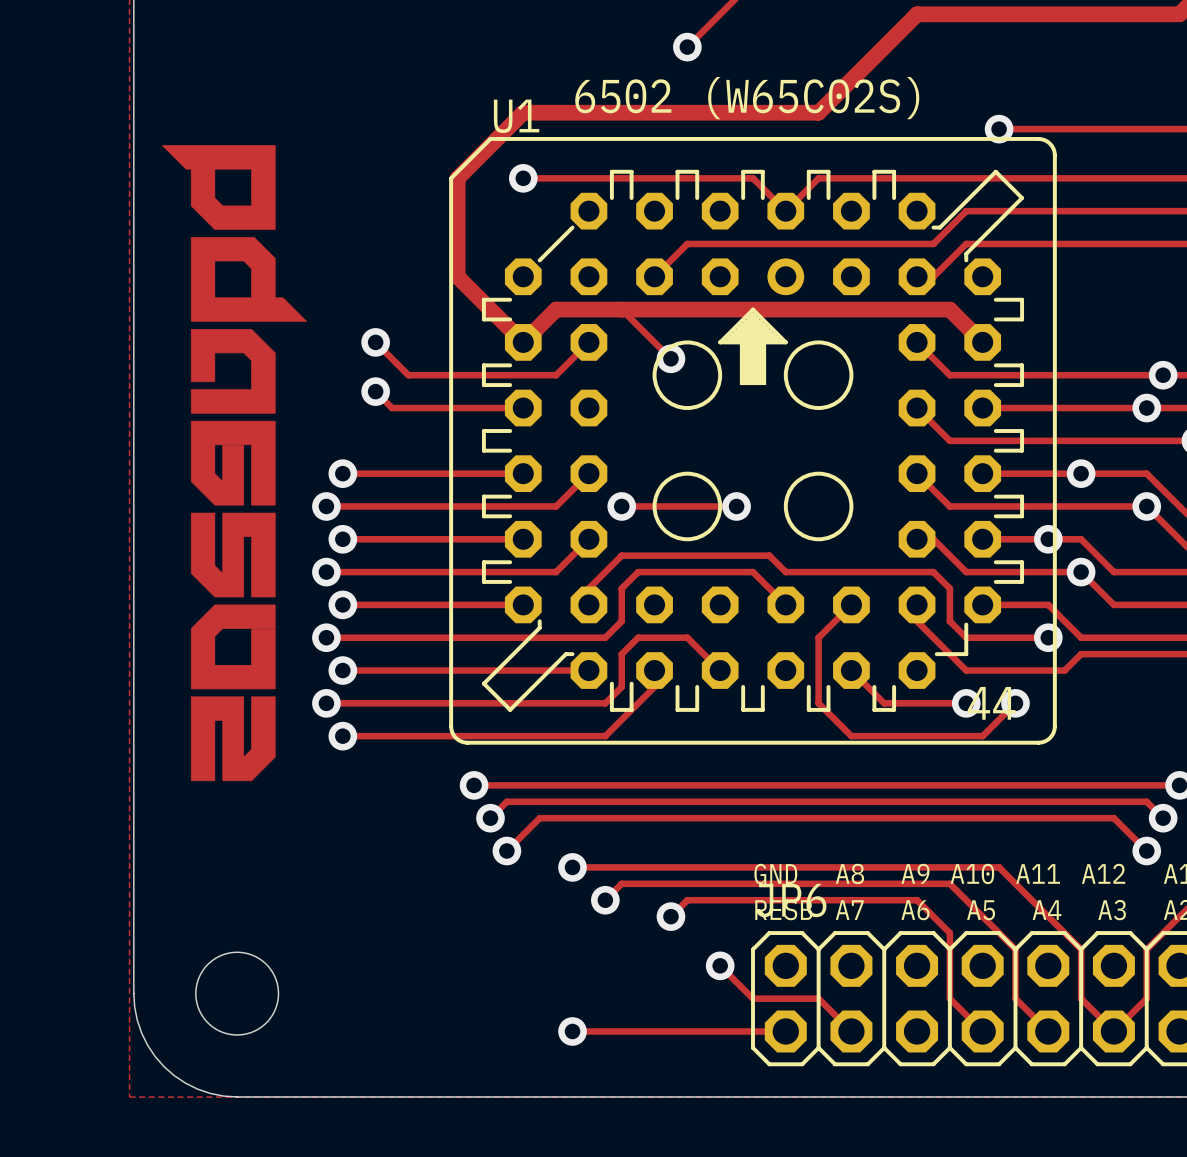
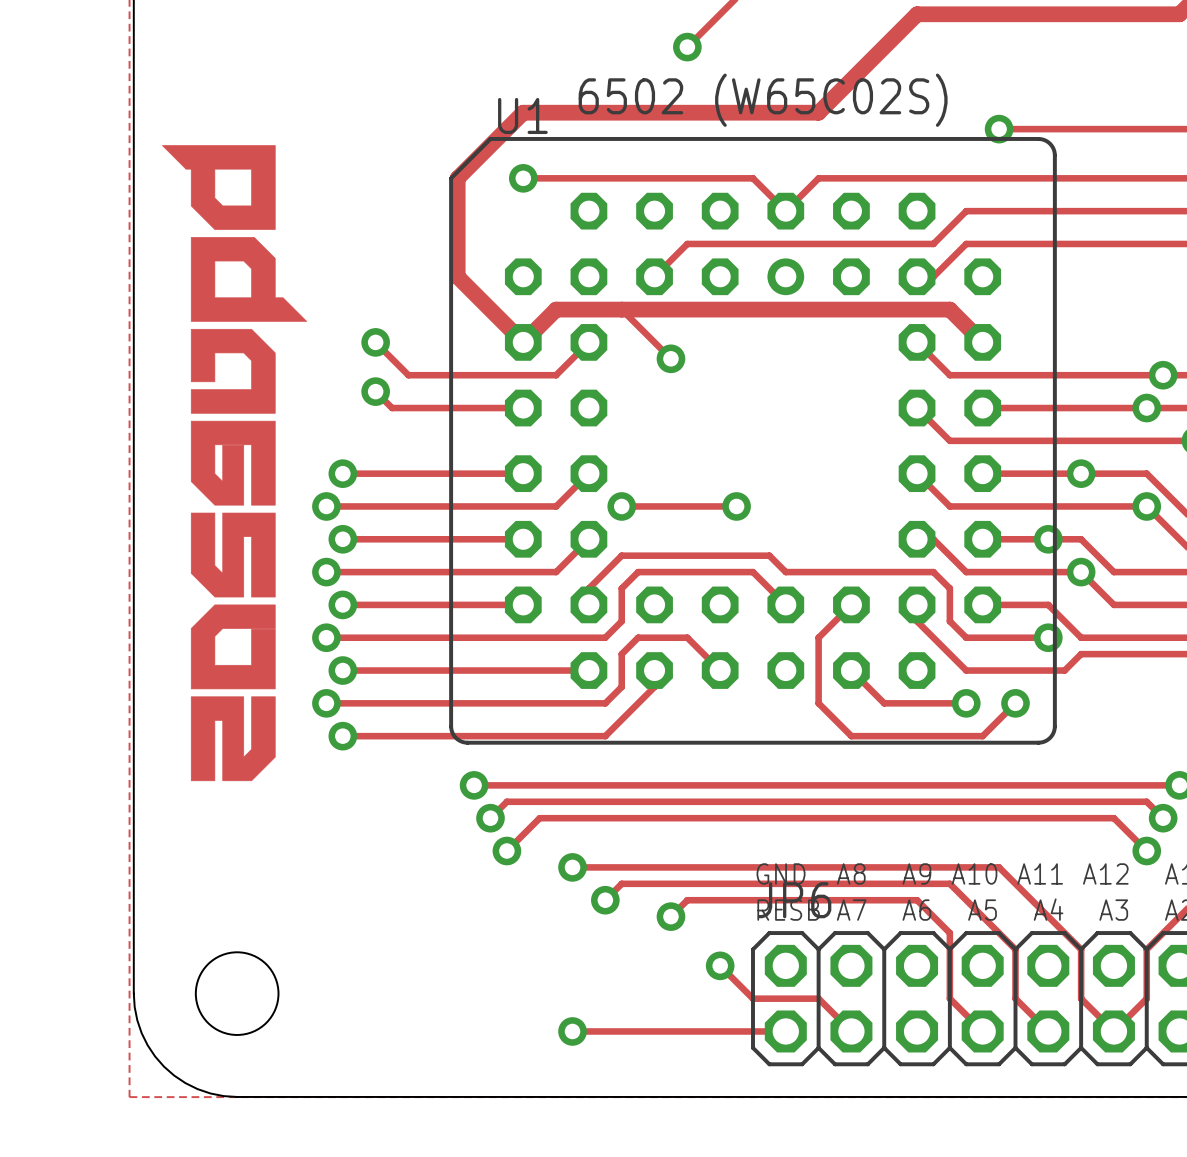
U1 footprint: [449, 136, 1057, 745] -> [449, 136, 1057, 745]

